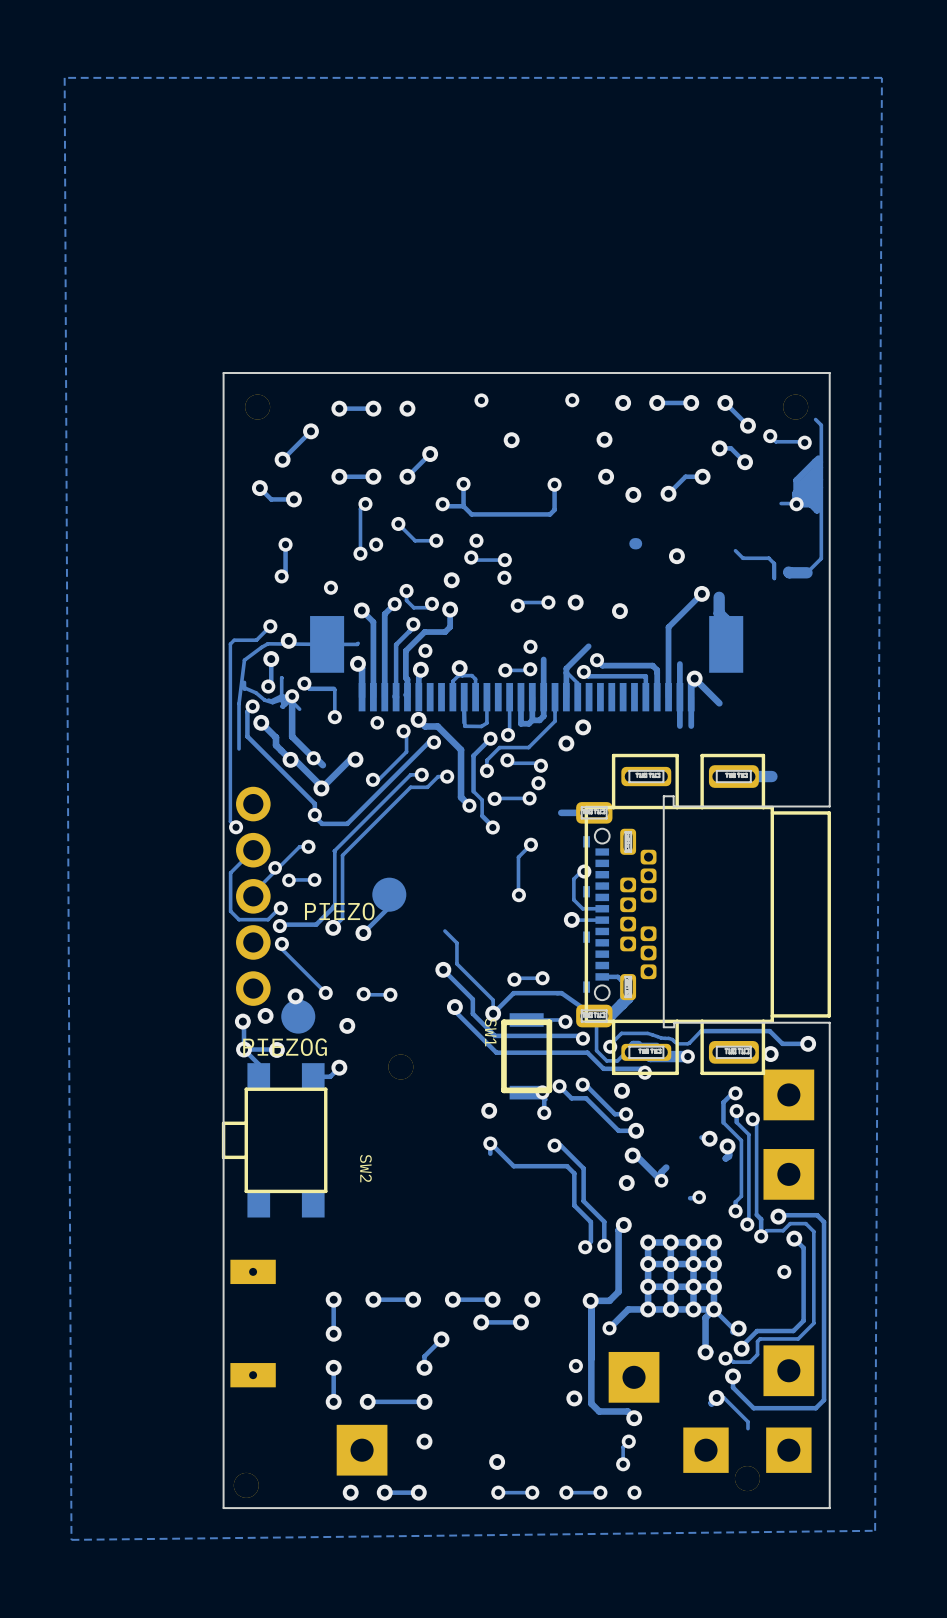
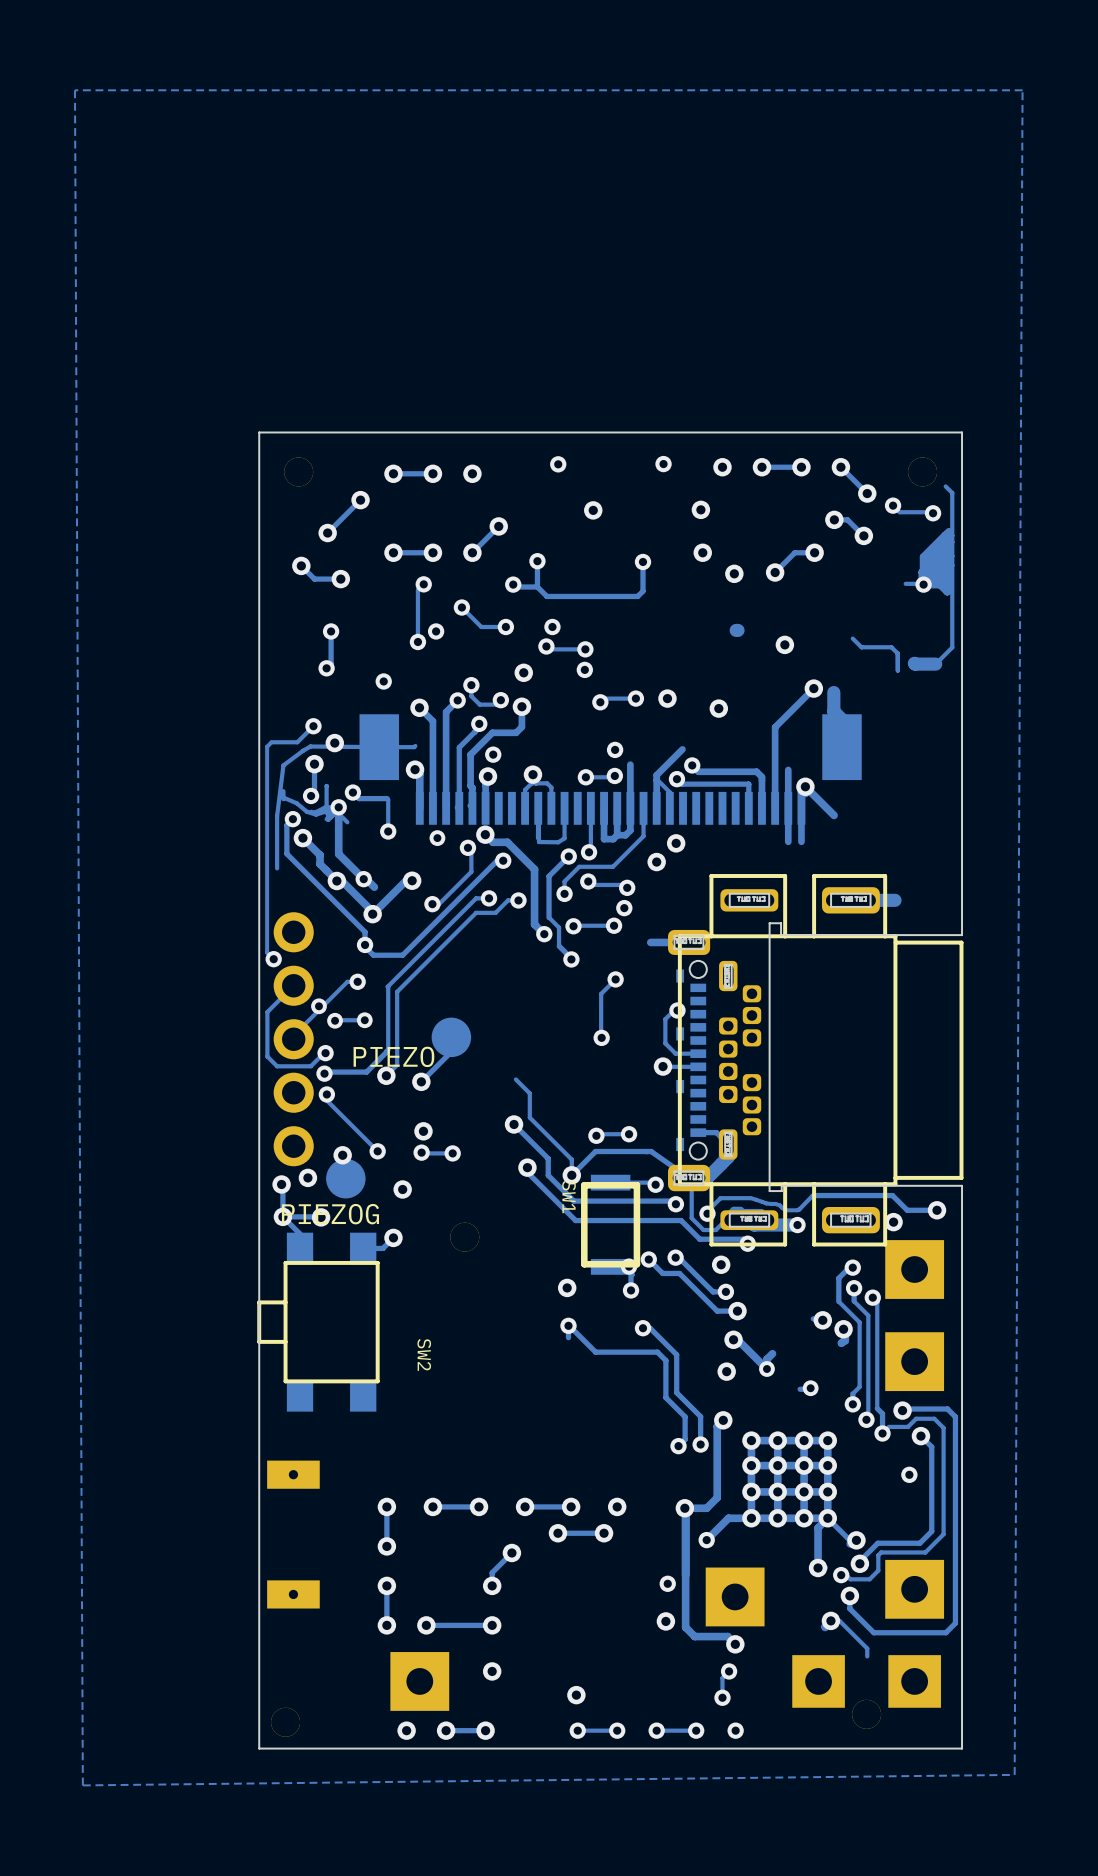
via: none -> (423, 1131)

